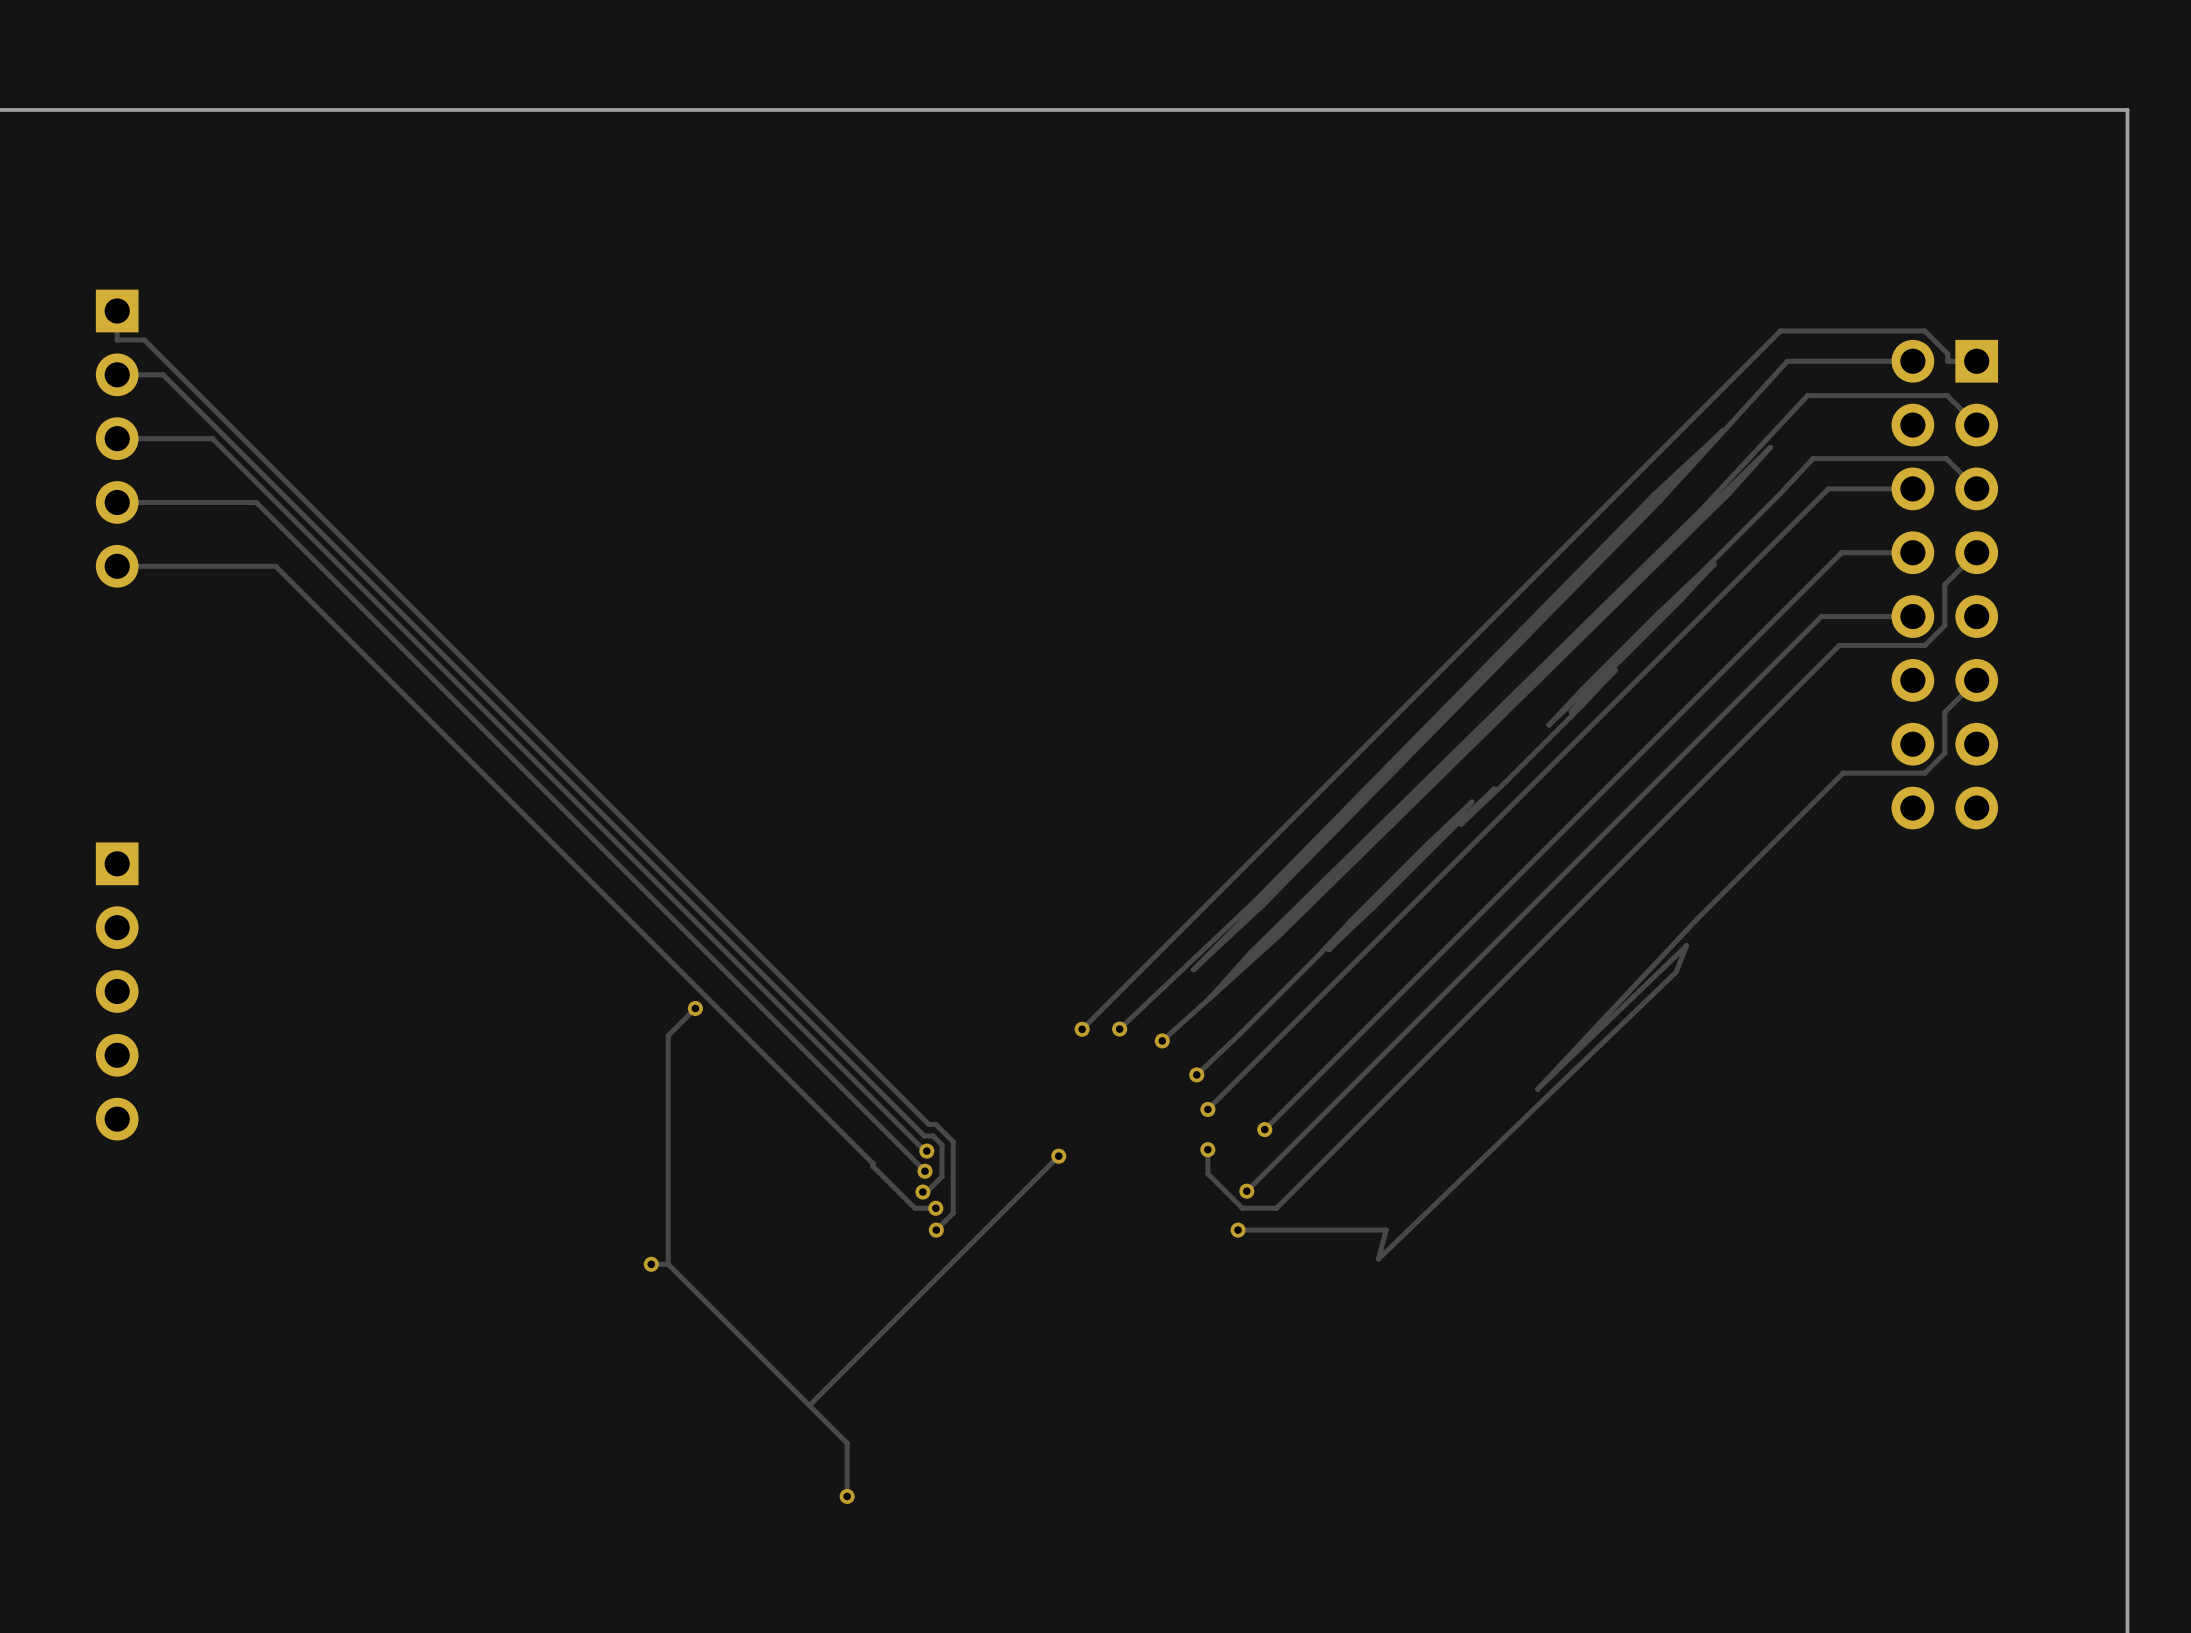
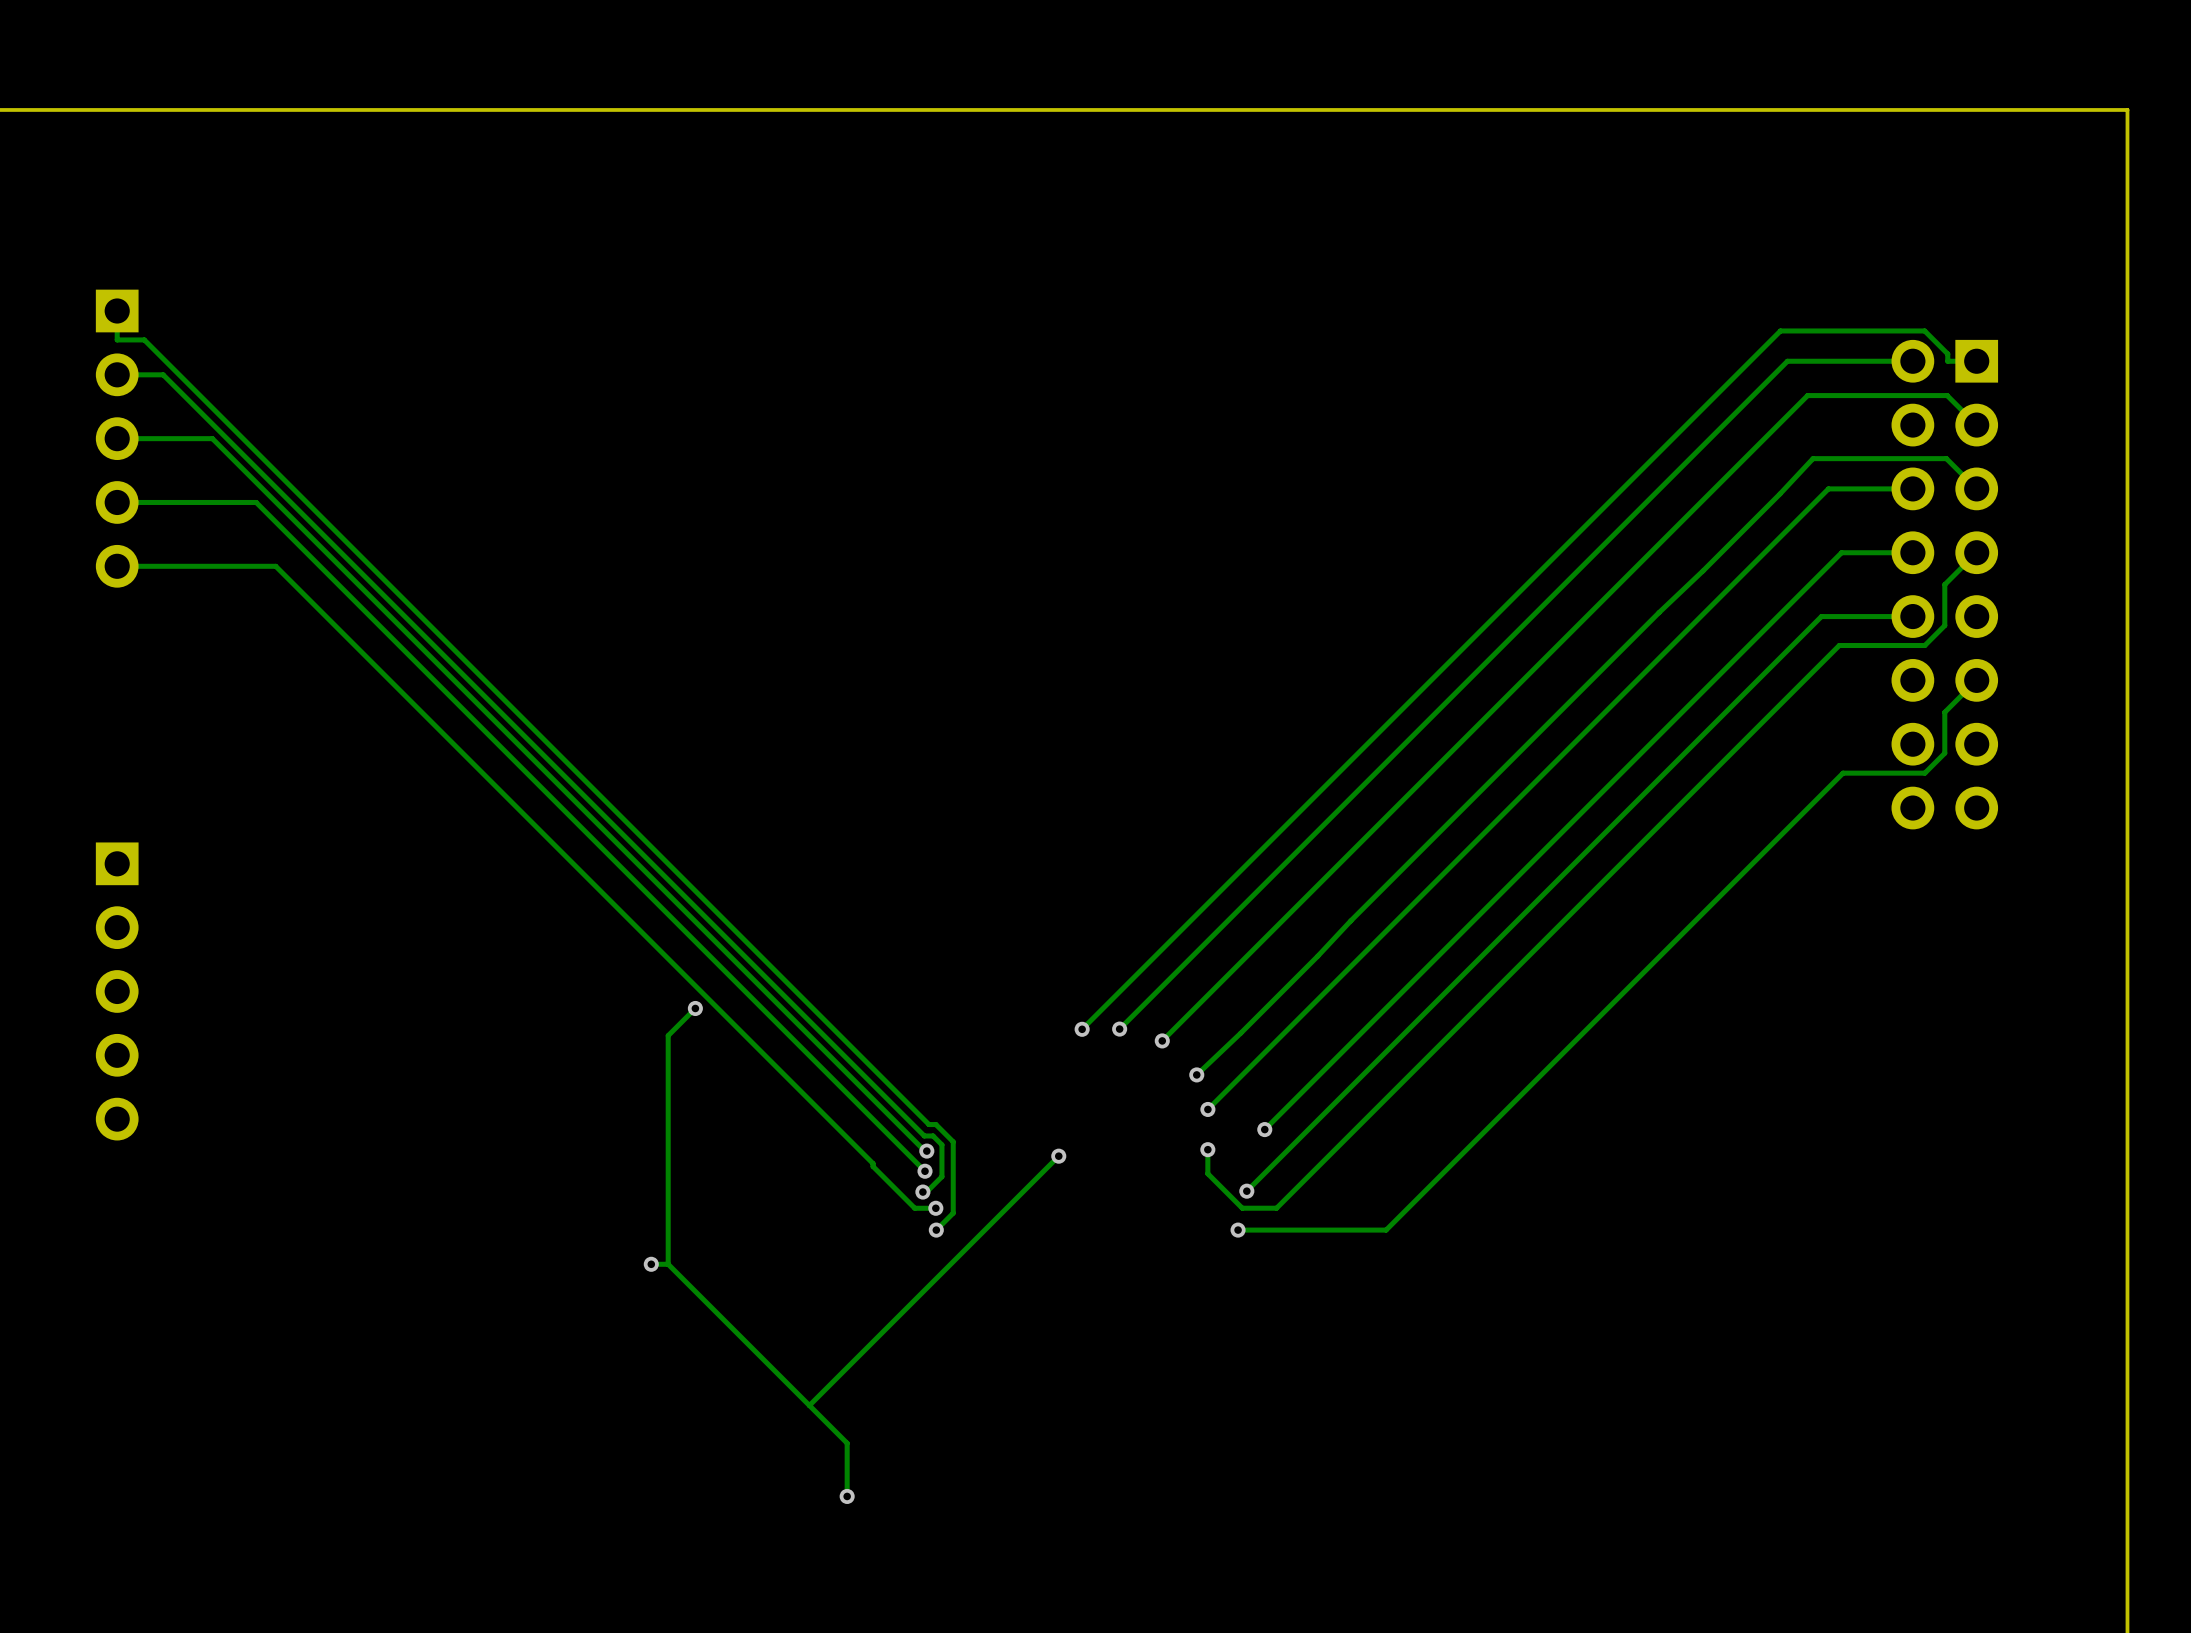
track: (1787, 361) (1660, 500) (1262, 905) (1193, 969) (1723, 430) (1653, 494) (1256, 899) (1119, 1029) -> (1787, 361) (1119, 1029)
track: (1807, 395) (1700, 510) (1251, 951) (1209, 998) (1770, 447) (1728, 494) (1279, 935) (1162, 1040) -> (1807, 395) (1162, 1040)
track: (1581, 689) (1548, 725) (1714, 564) (1571, 711) (1615, 670) (1582, 705) (1505, 782) (1461, 824) (1494, 789) (1328, 949) (1471, 802) (1427, 843) -> (1581, 689) (1427, 843)
track: (1696, 919) (1537, 1089) (1686, 945) (1676, 971) (1378, 1259) (1386, 1230) -> (1696, 919) (1386, 1230)

